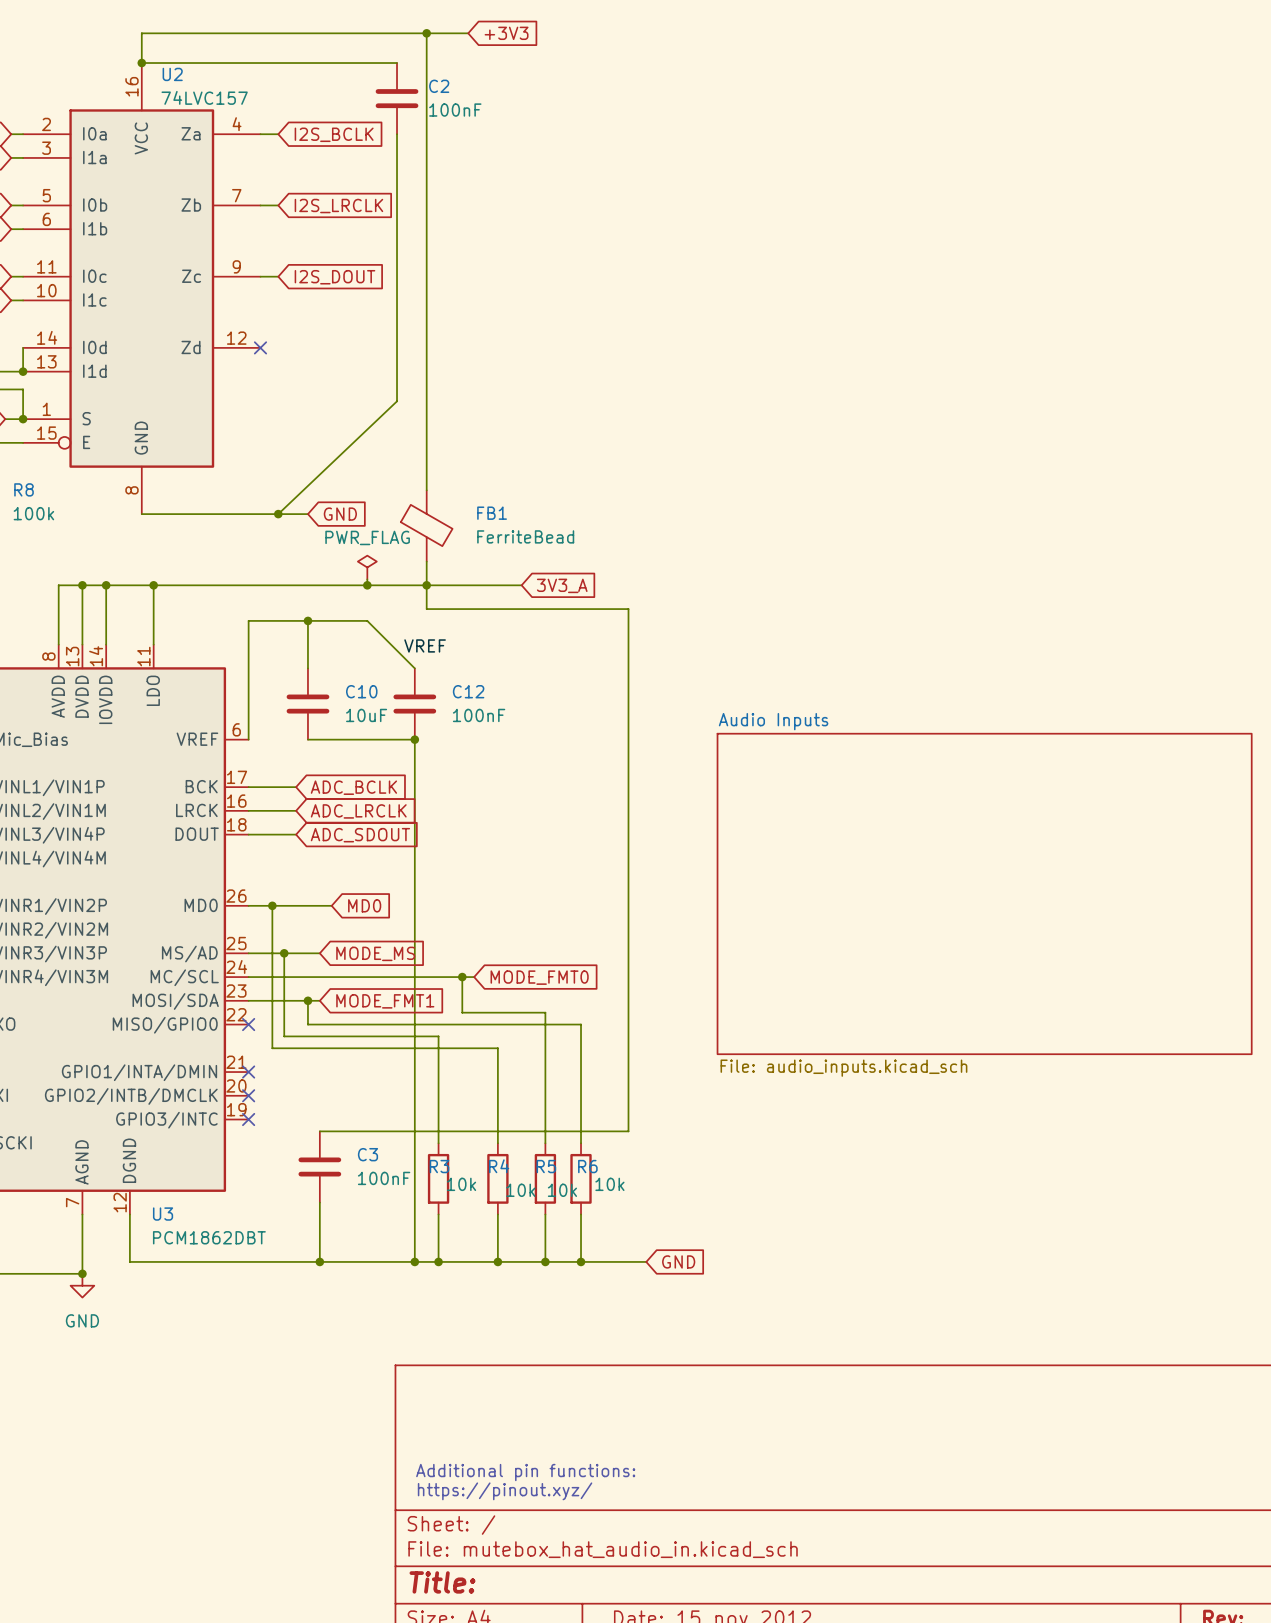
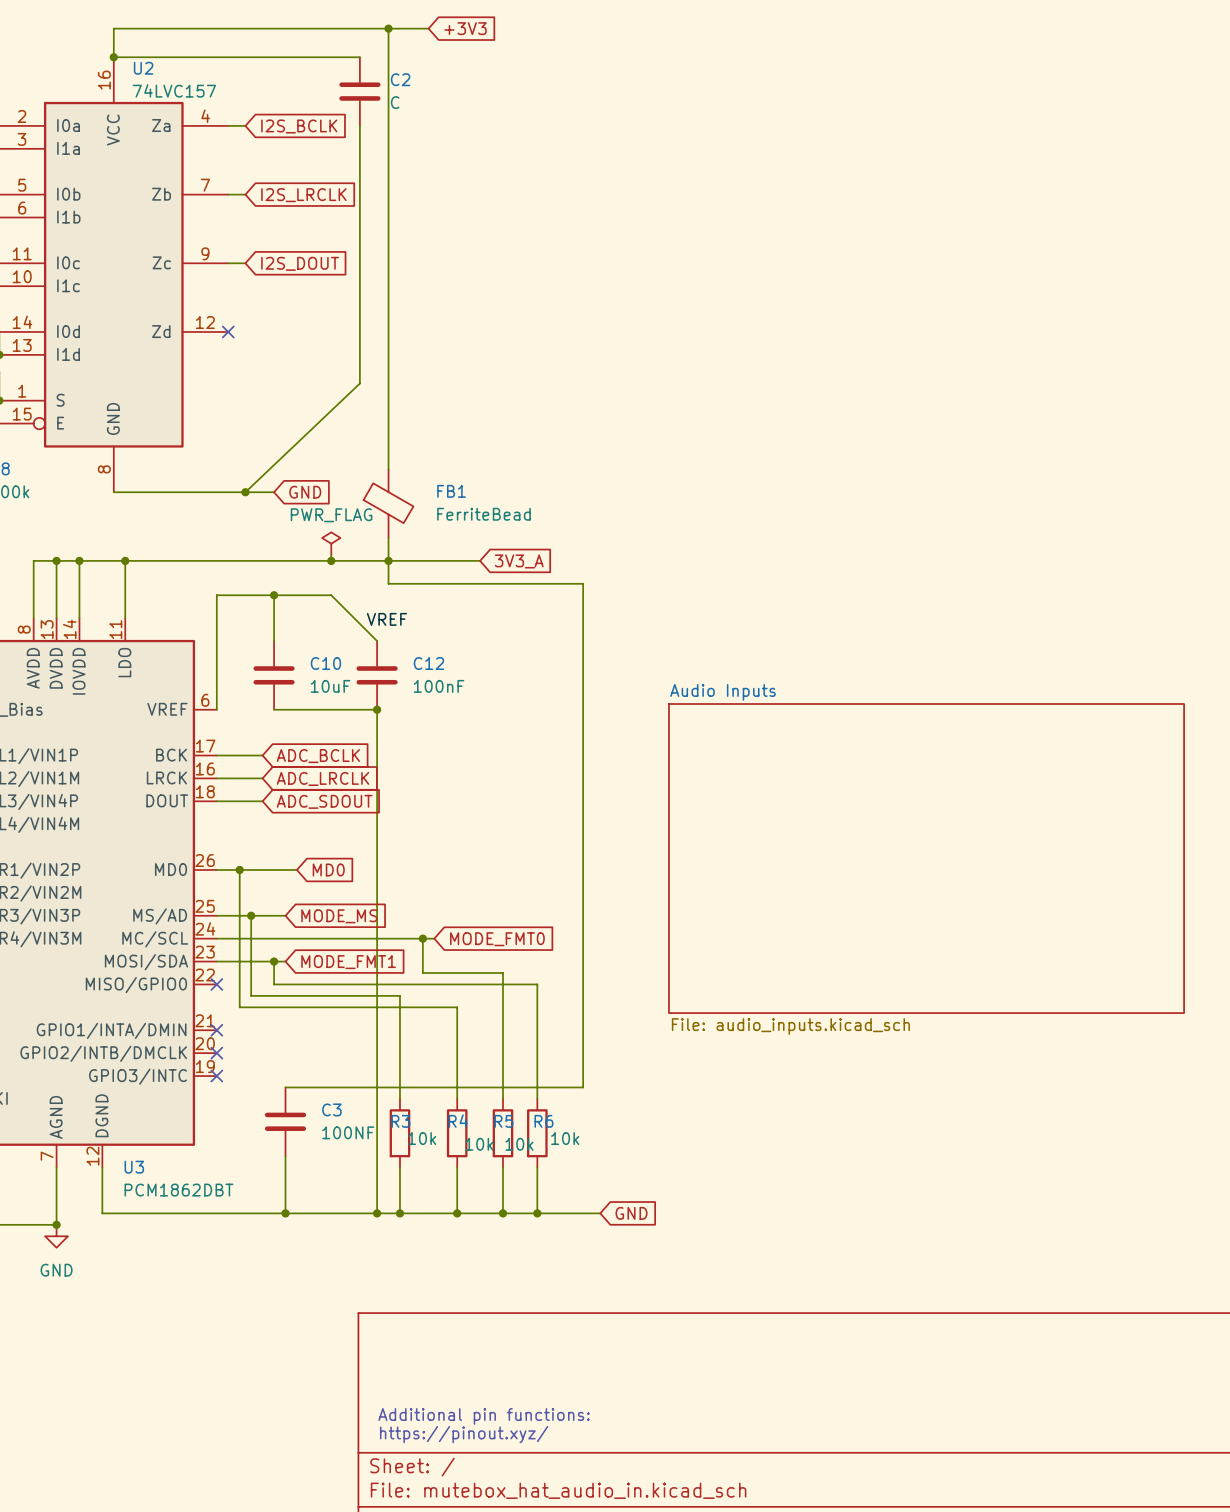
C2 value: 100nF (455, 110) -> C (395, 102)
C3 value: 100nF (384, 1178) -> 100NF (348, 1132)

